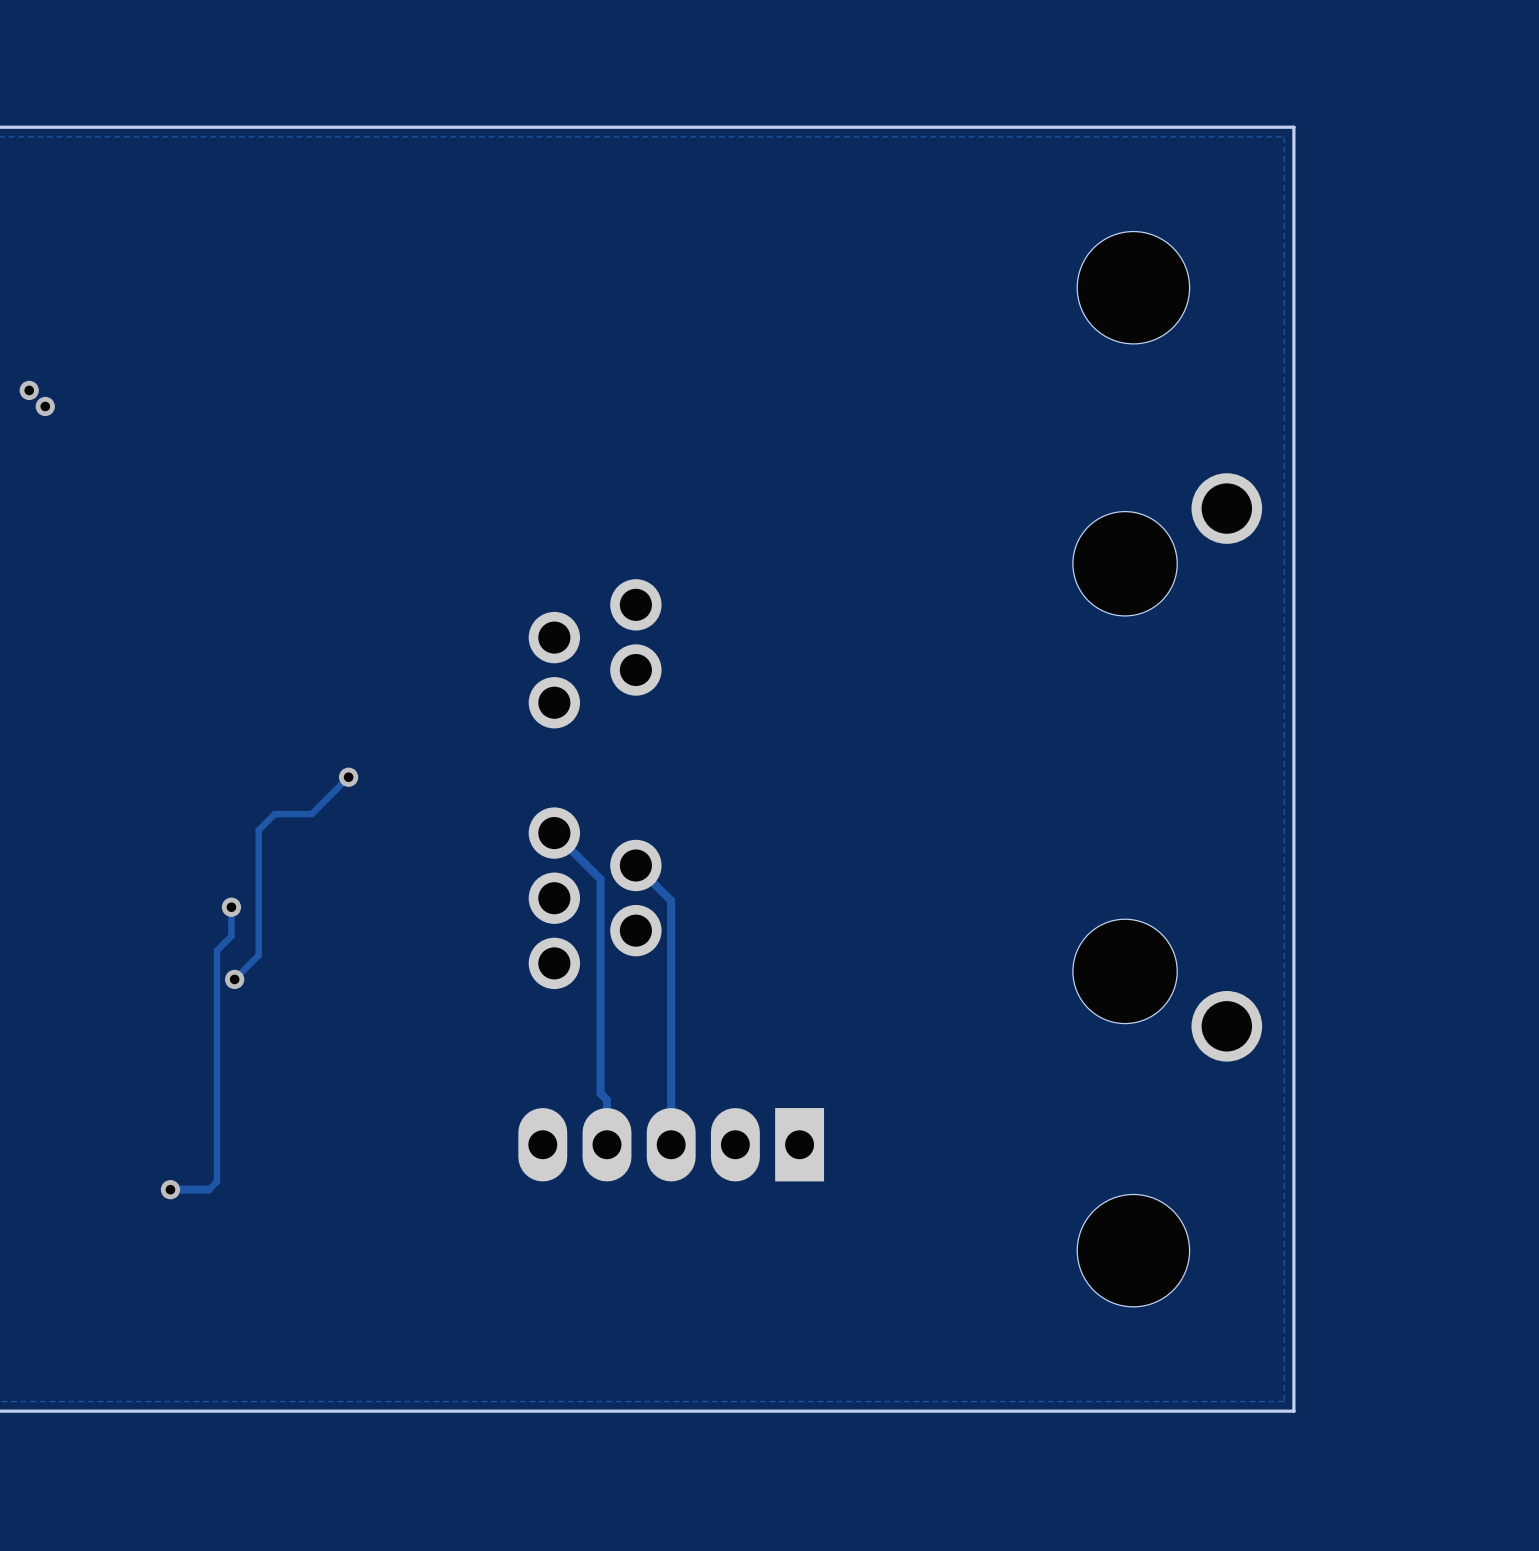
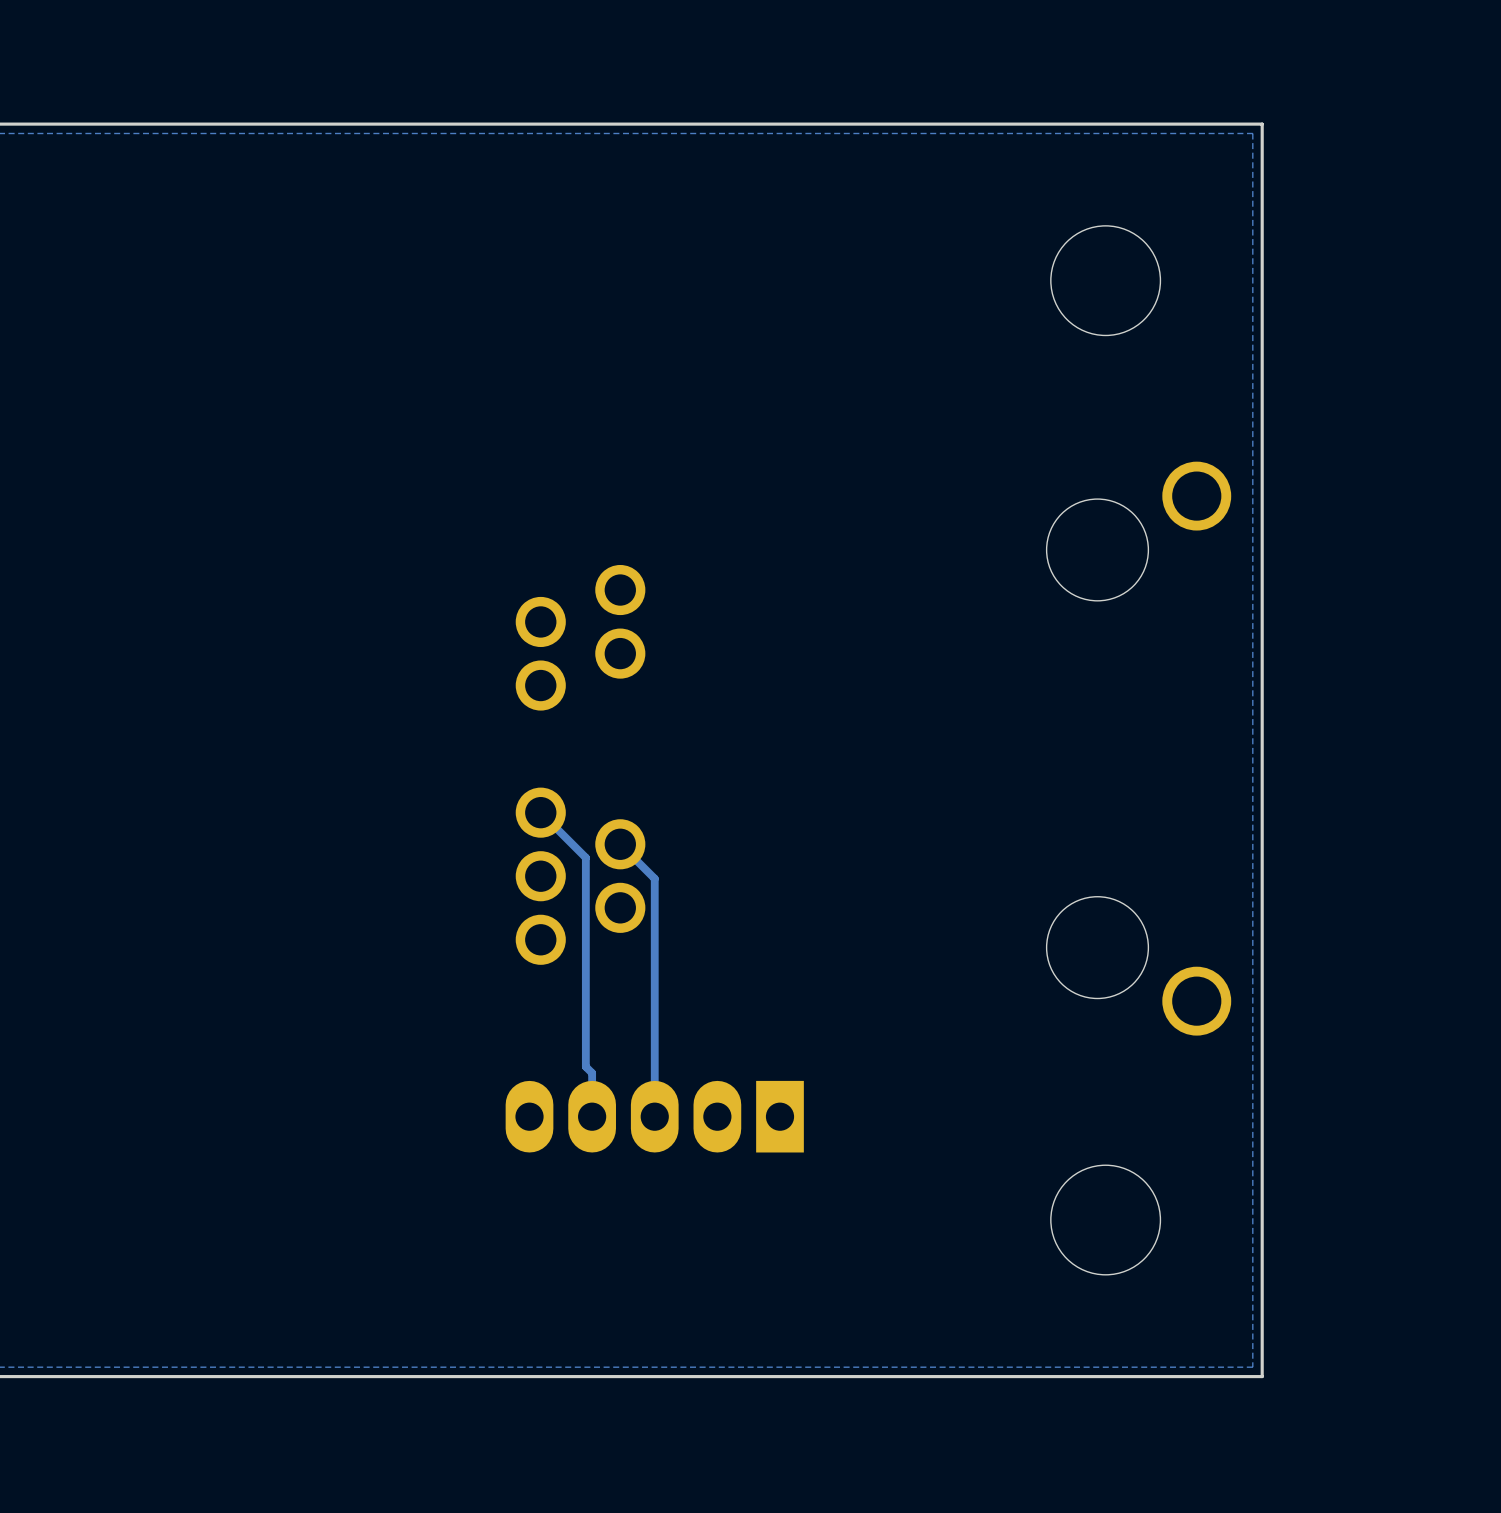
via: (29, 390) -> none
via: (45, 406) -> none
track: (348, 777) (311, 814) (274, 814) (258, 830) (258, 955) (234, 979) -> none
via: (348, 777) -> none
track: (231, 907) (231, 936) (217, 950) (217, 1181) (208, 1189) (170, 1189) -> none
via: (231, 907) -> none
via: (234, 979) -> none
via: (170, 1189) -> none

